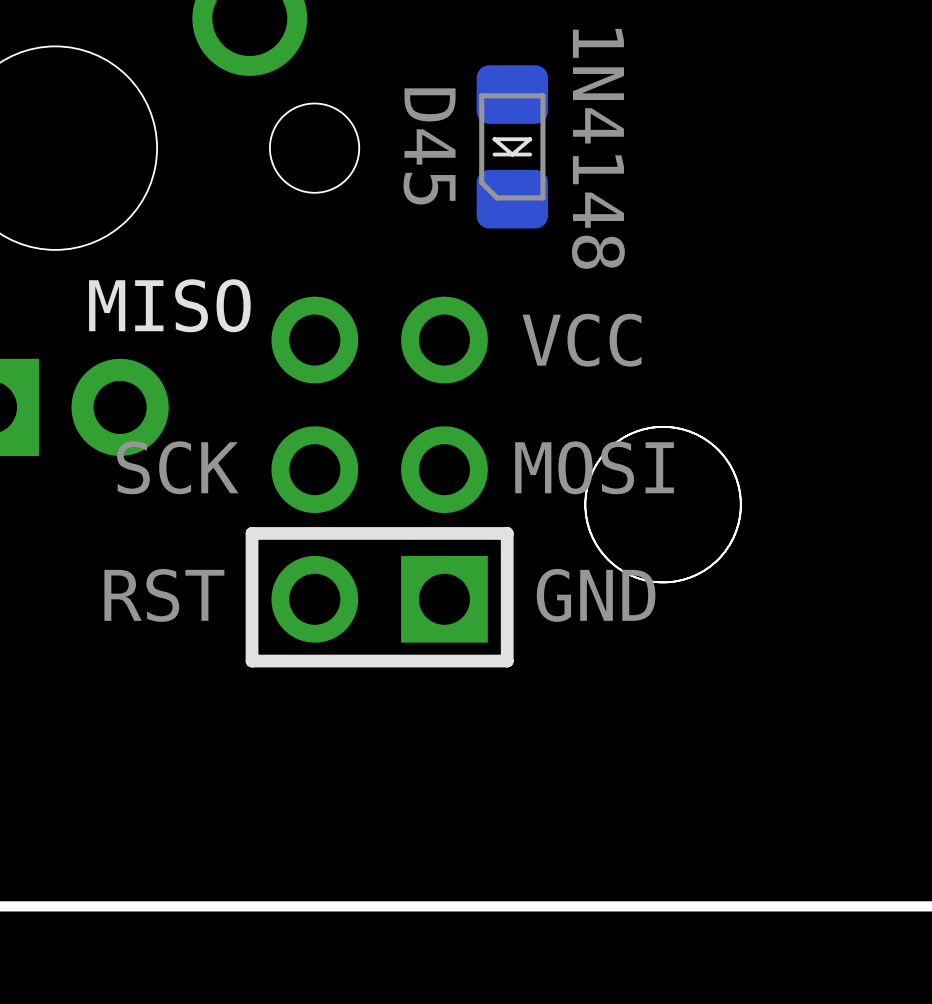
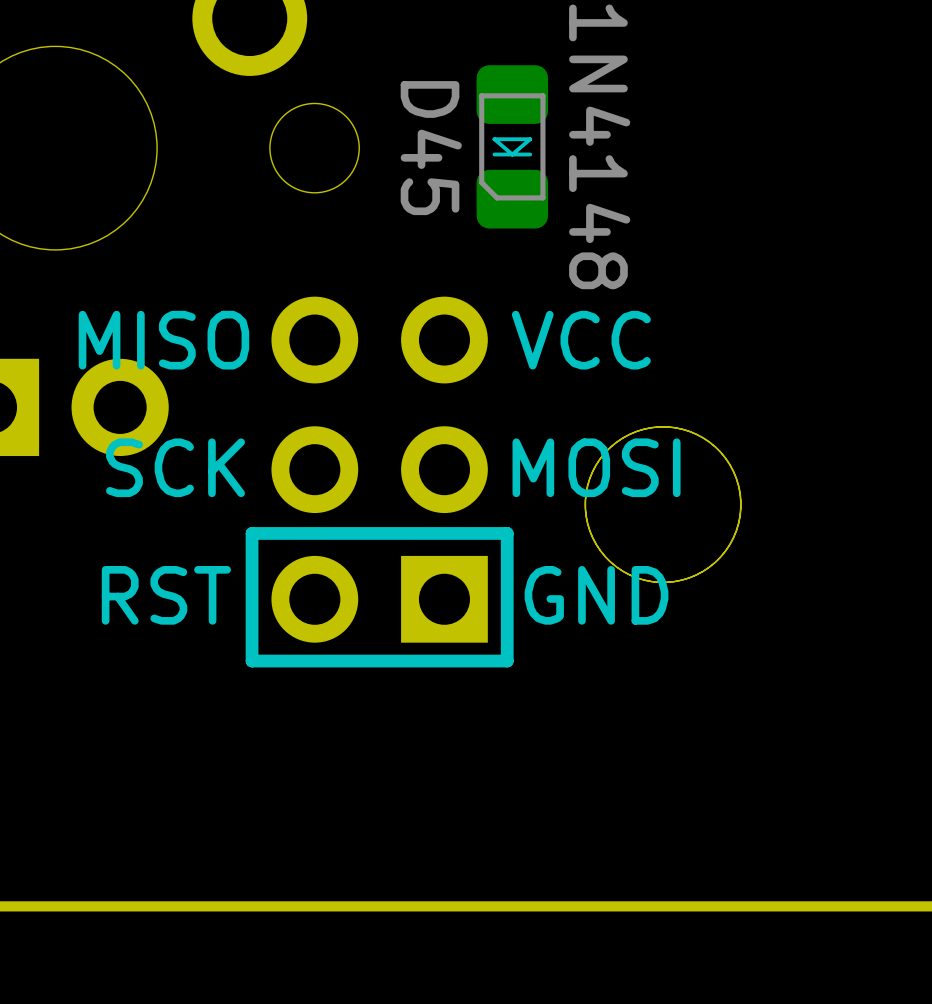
part footprint: [245, 296, 514, 668] -> [245, 296, 514, 668]

